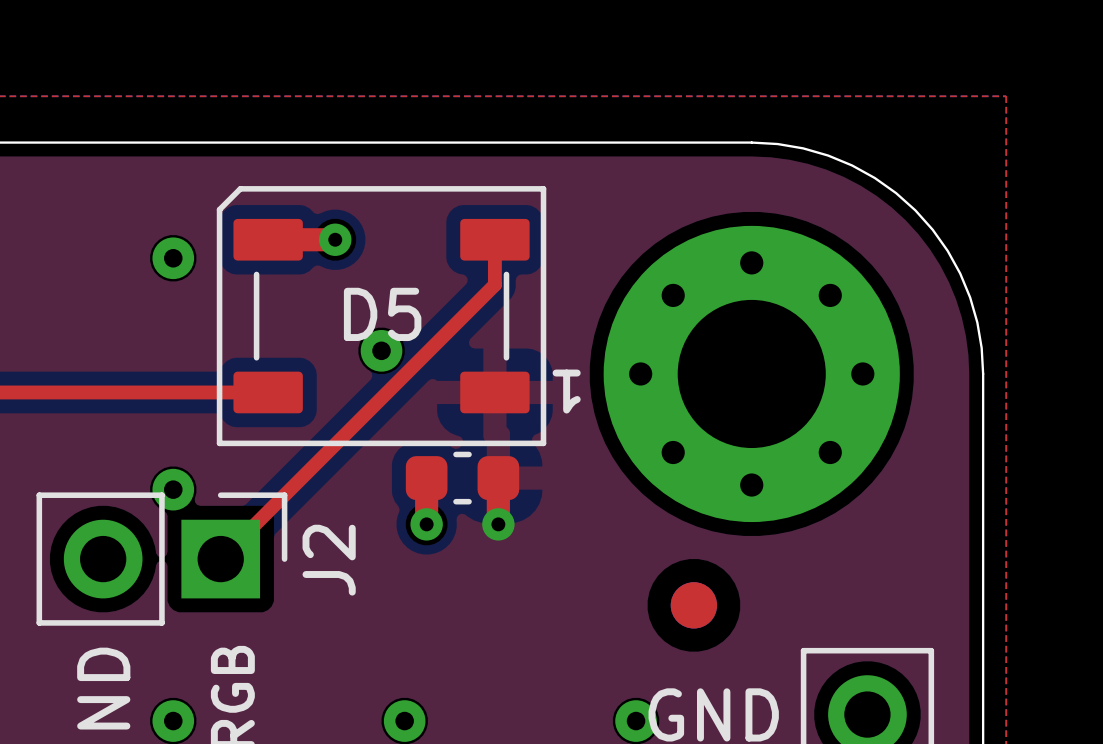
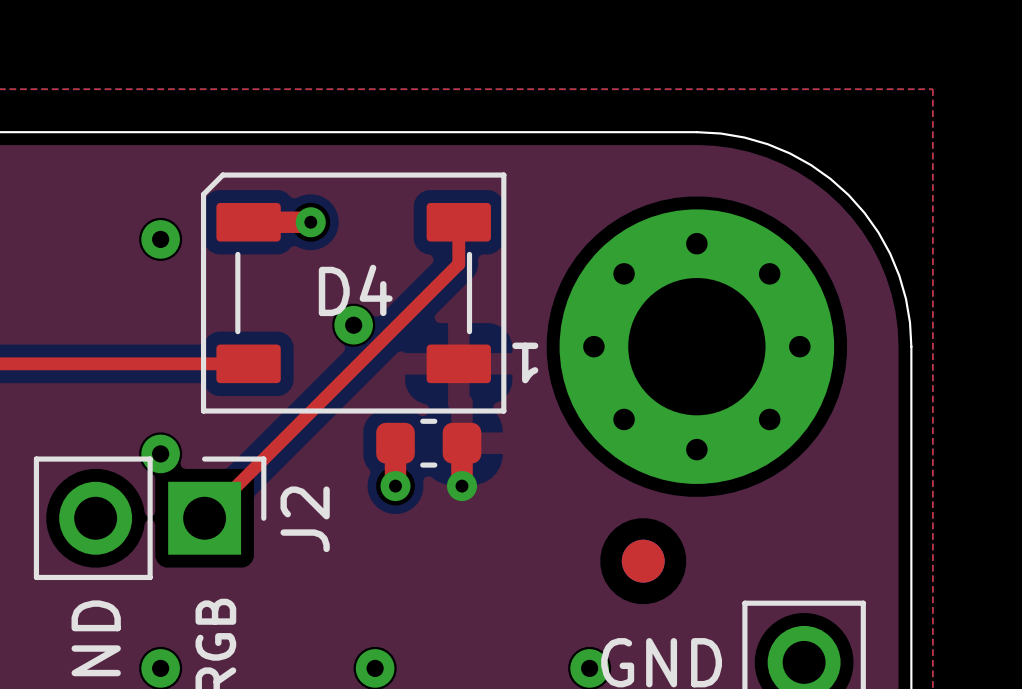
D5 name: D5 (382, 314) -> D4 (355, 290)

